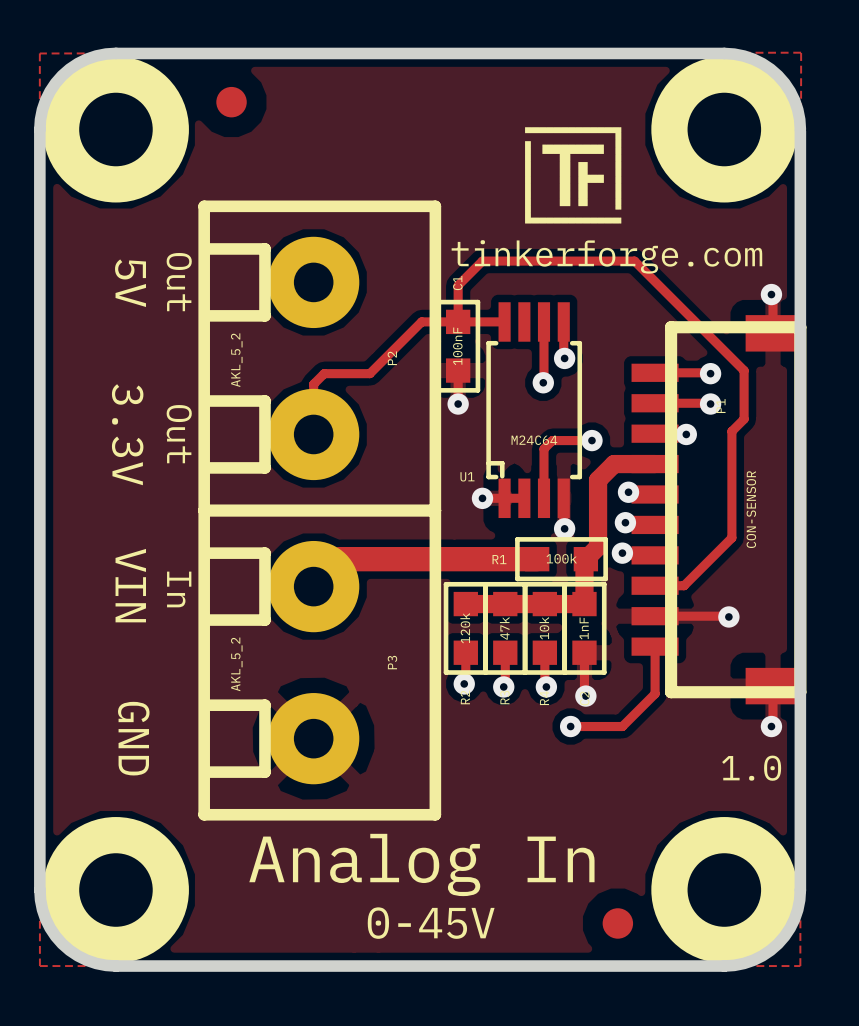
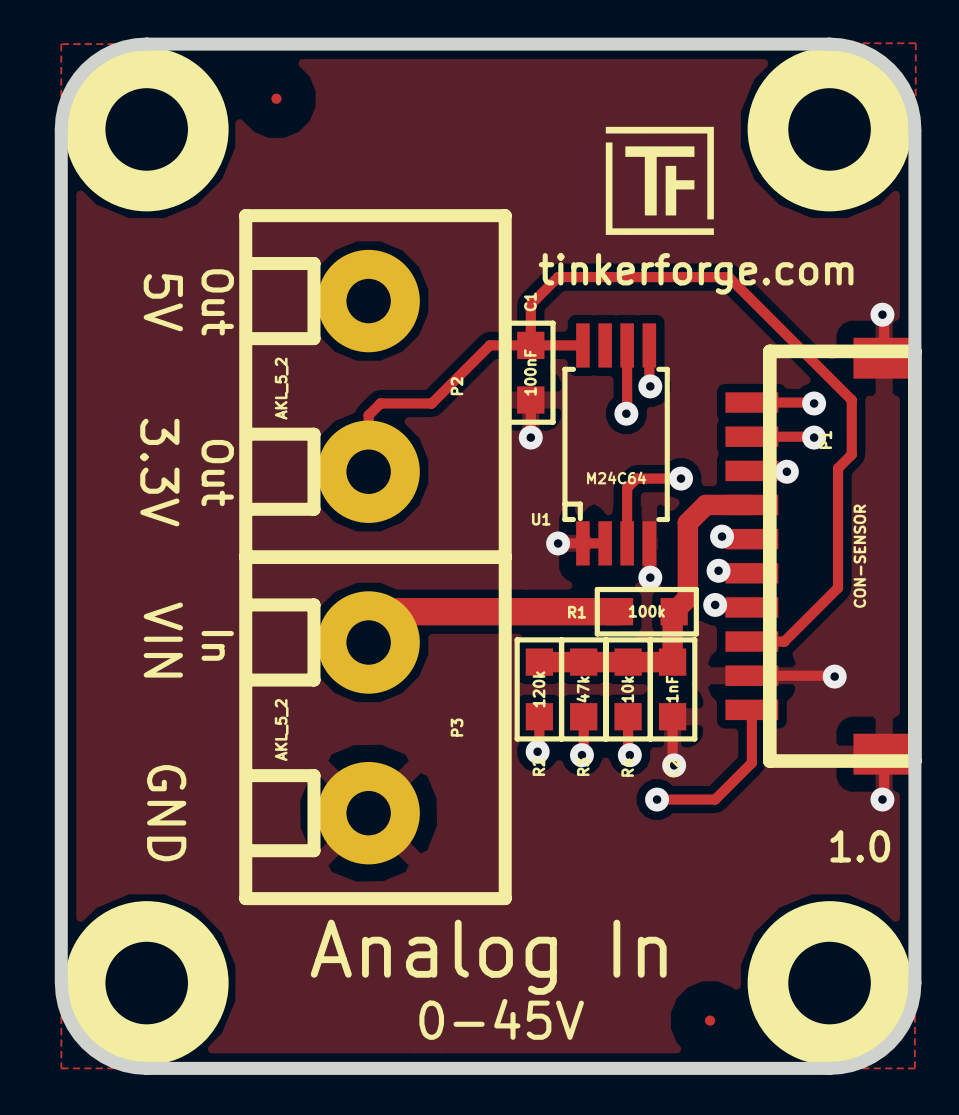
part footprint: [216, 86, 247, 118] -> [271, 93, 282, 104]
part footprint: [602, 908, 634, 939] -> [704, 1015, 716, 1026]

